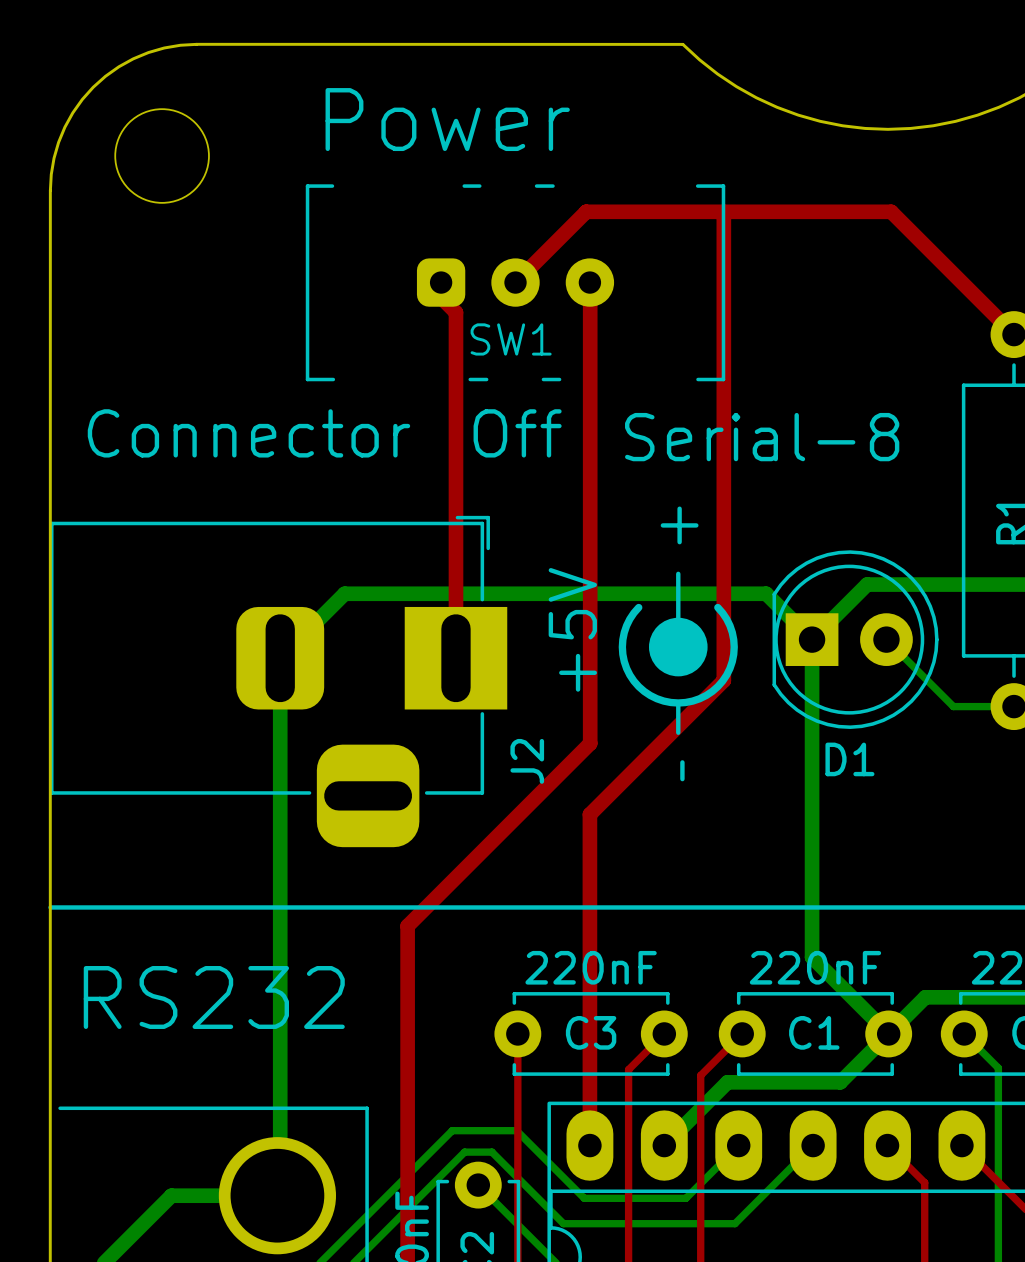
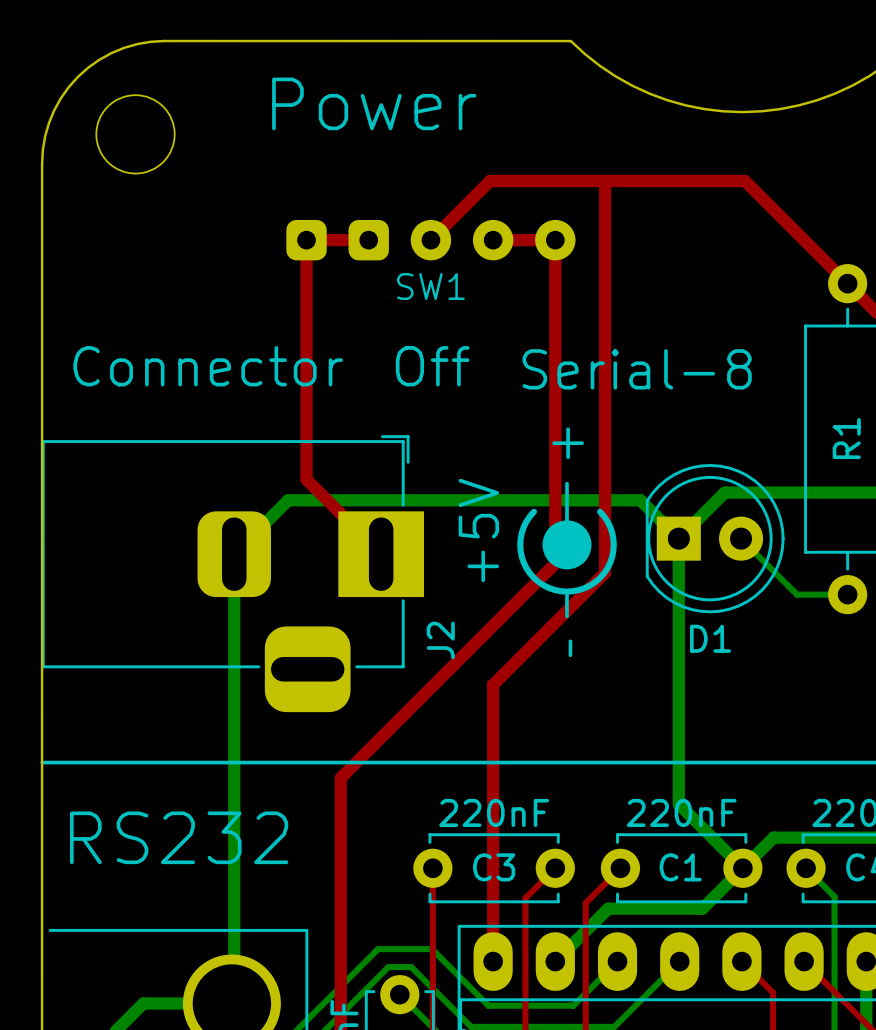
SW1 footprint: [305, 184, 726, 382] -> [286, 219, 576, 261]
top track: (441, 282) (441, 297) (455, 312) (455, 658) -> (368, 240) (306, 240) (306, 479) (381, 554)
top track: (590, 282) (590, 743) -> (493, 240) (555, 240) (555, 563) (493, 625)

